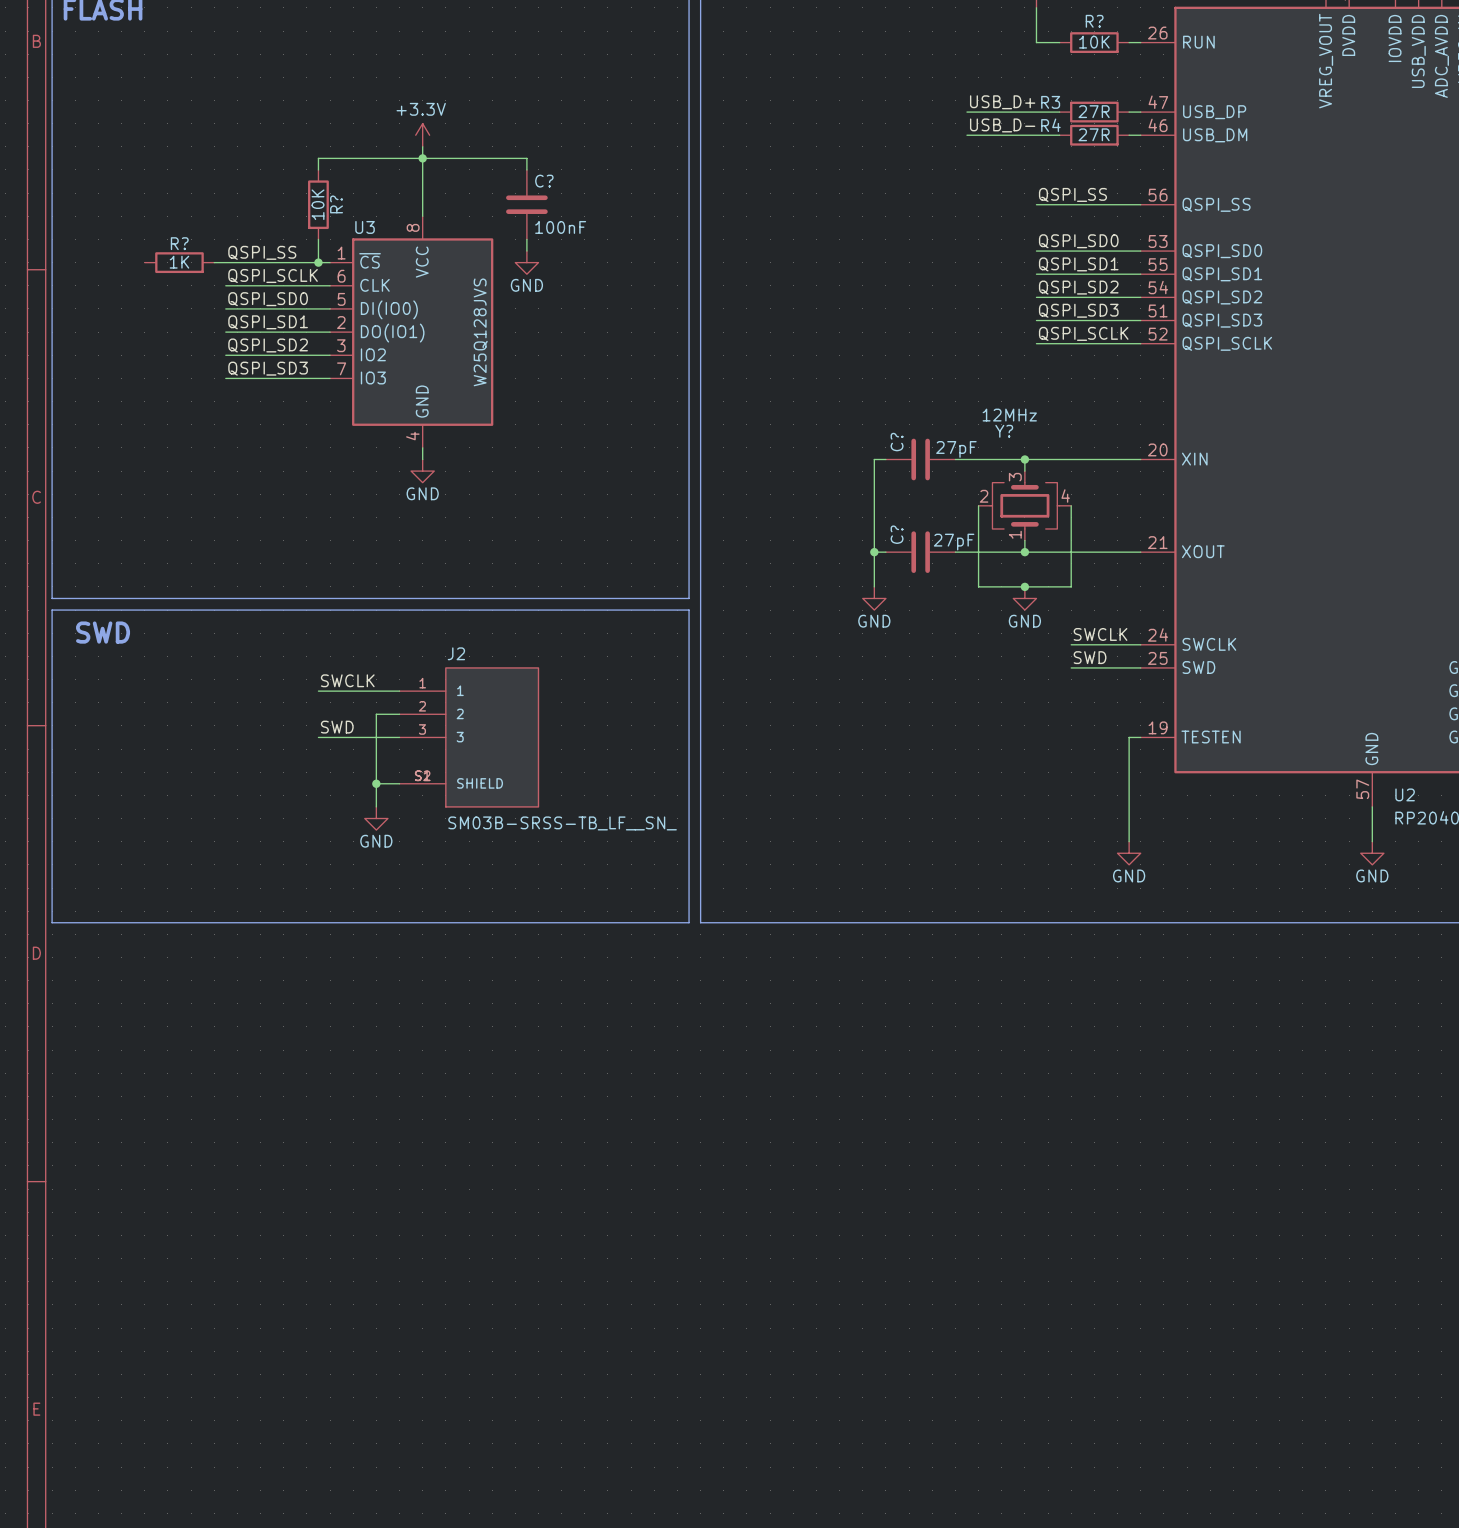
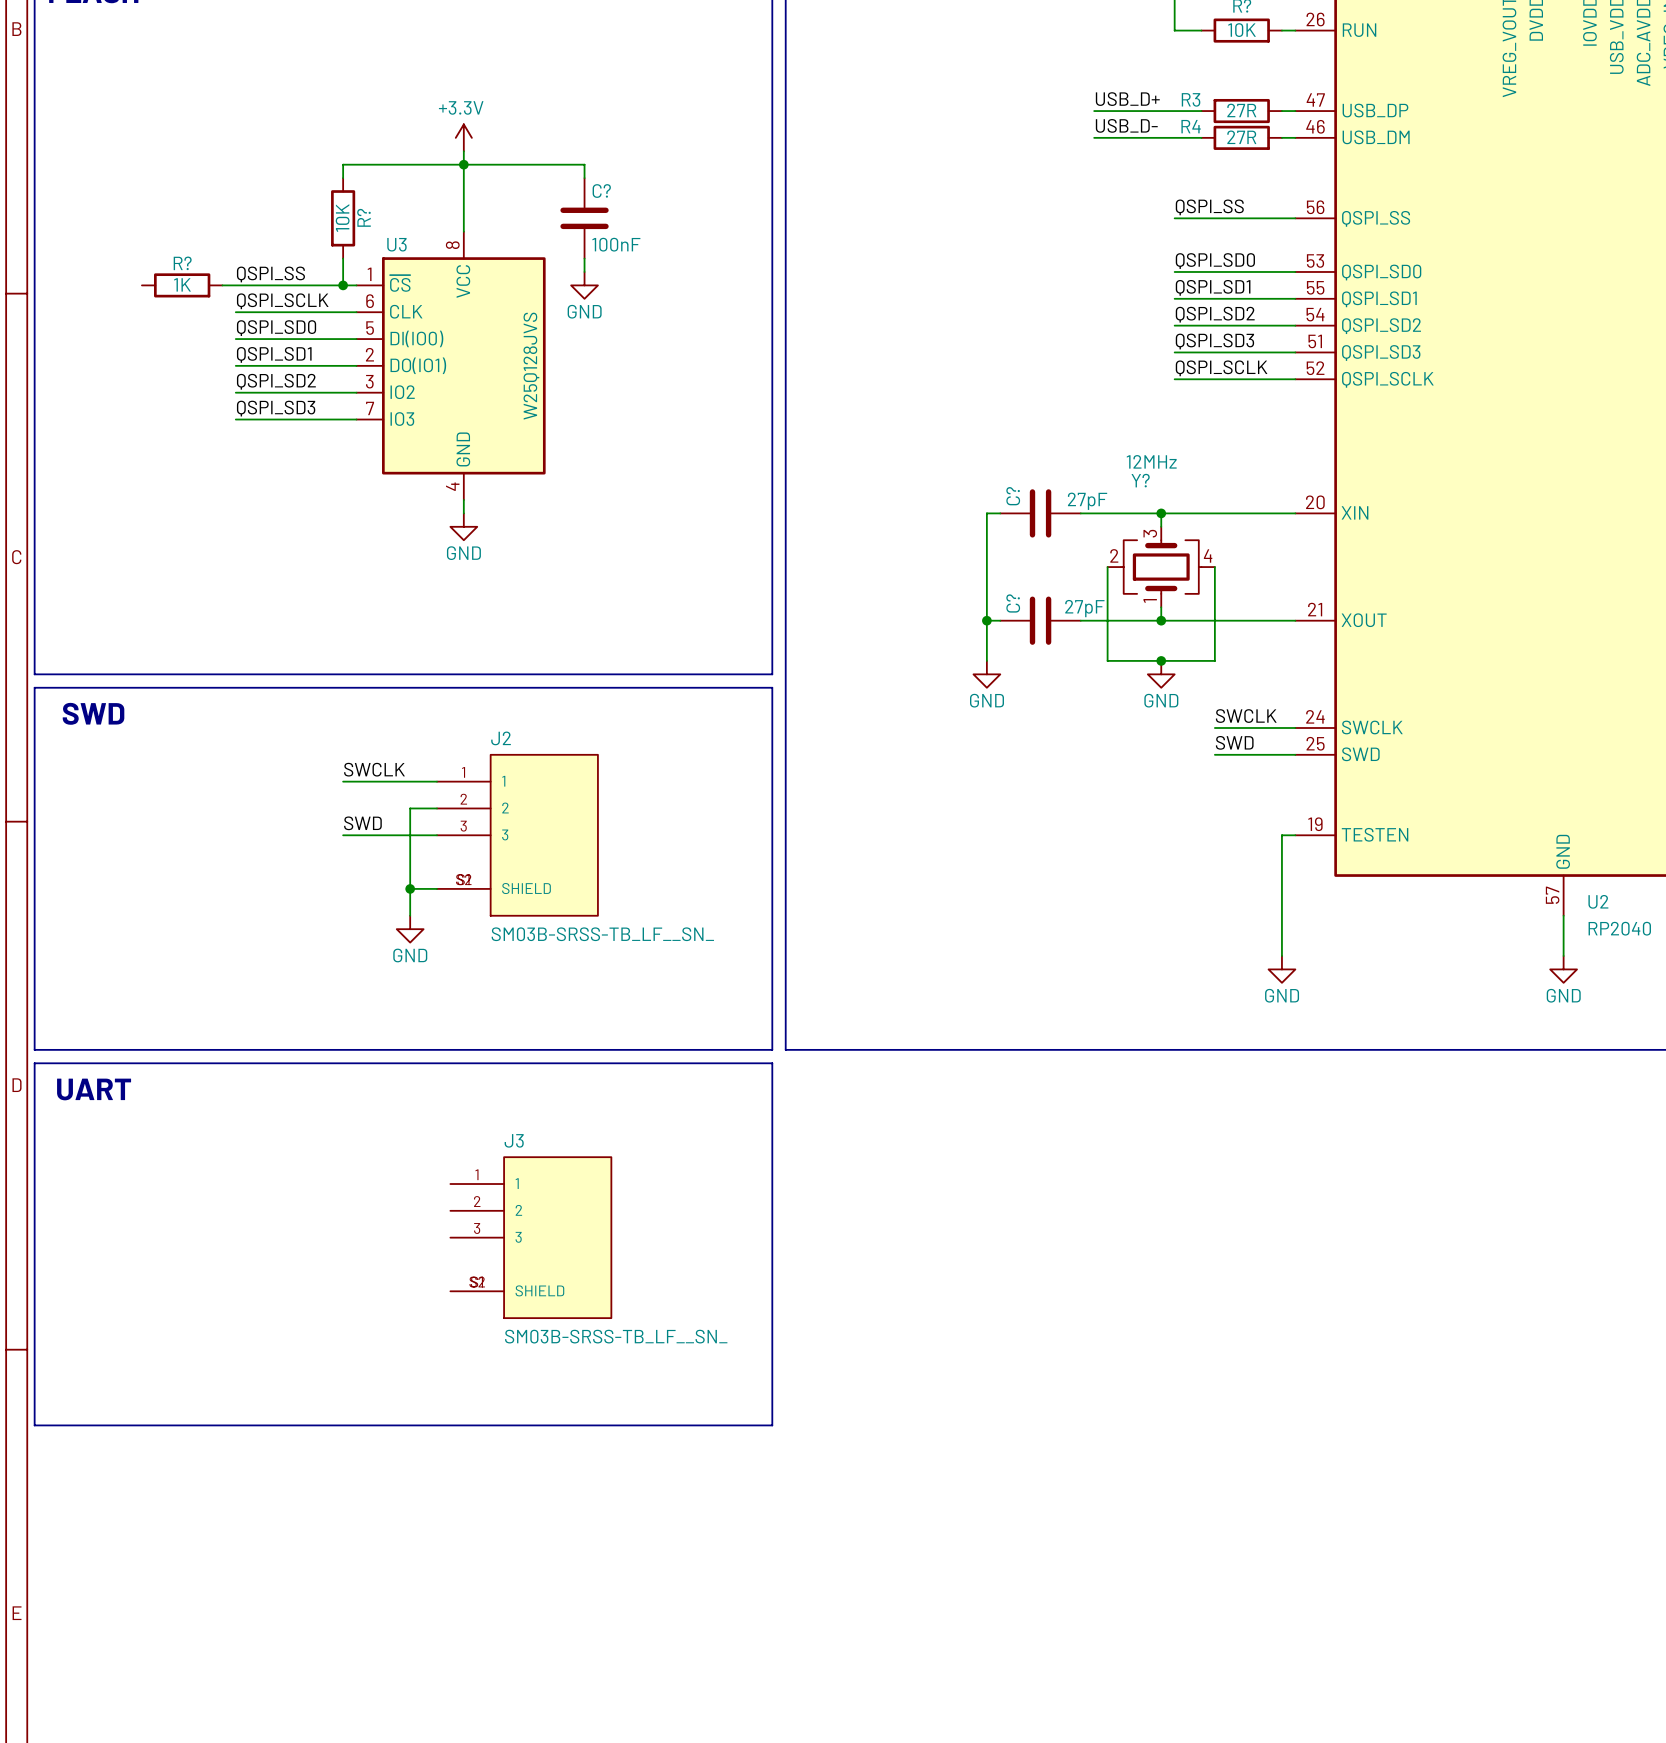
line: none -> (34, 1063) (772, 1063) (772, 1425) (34, 1425) (34, 1063)
text: none -> UART (94, 1089)
J3: none -> SM03B-SRSS-TB_LF__SN_ (531, 1237)

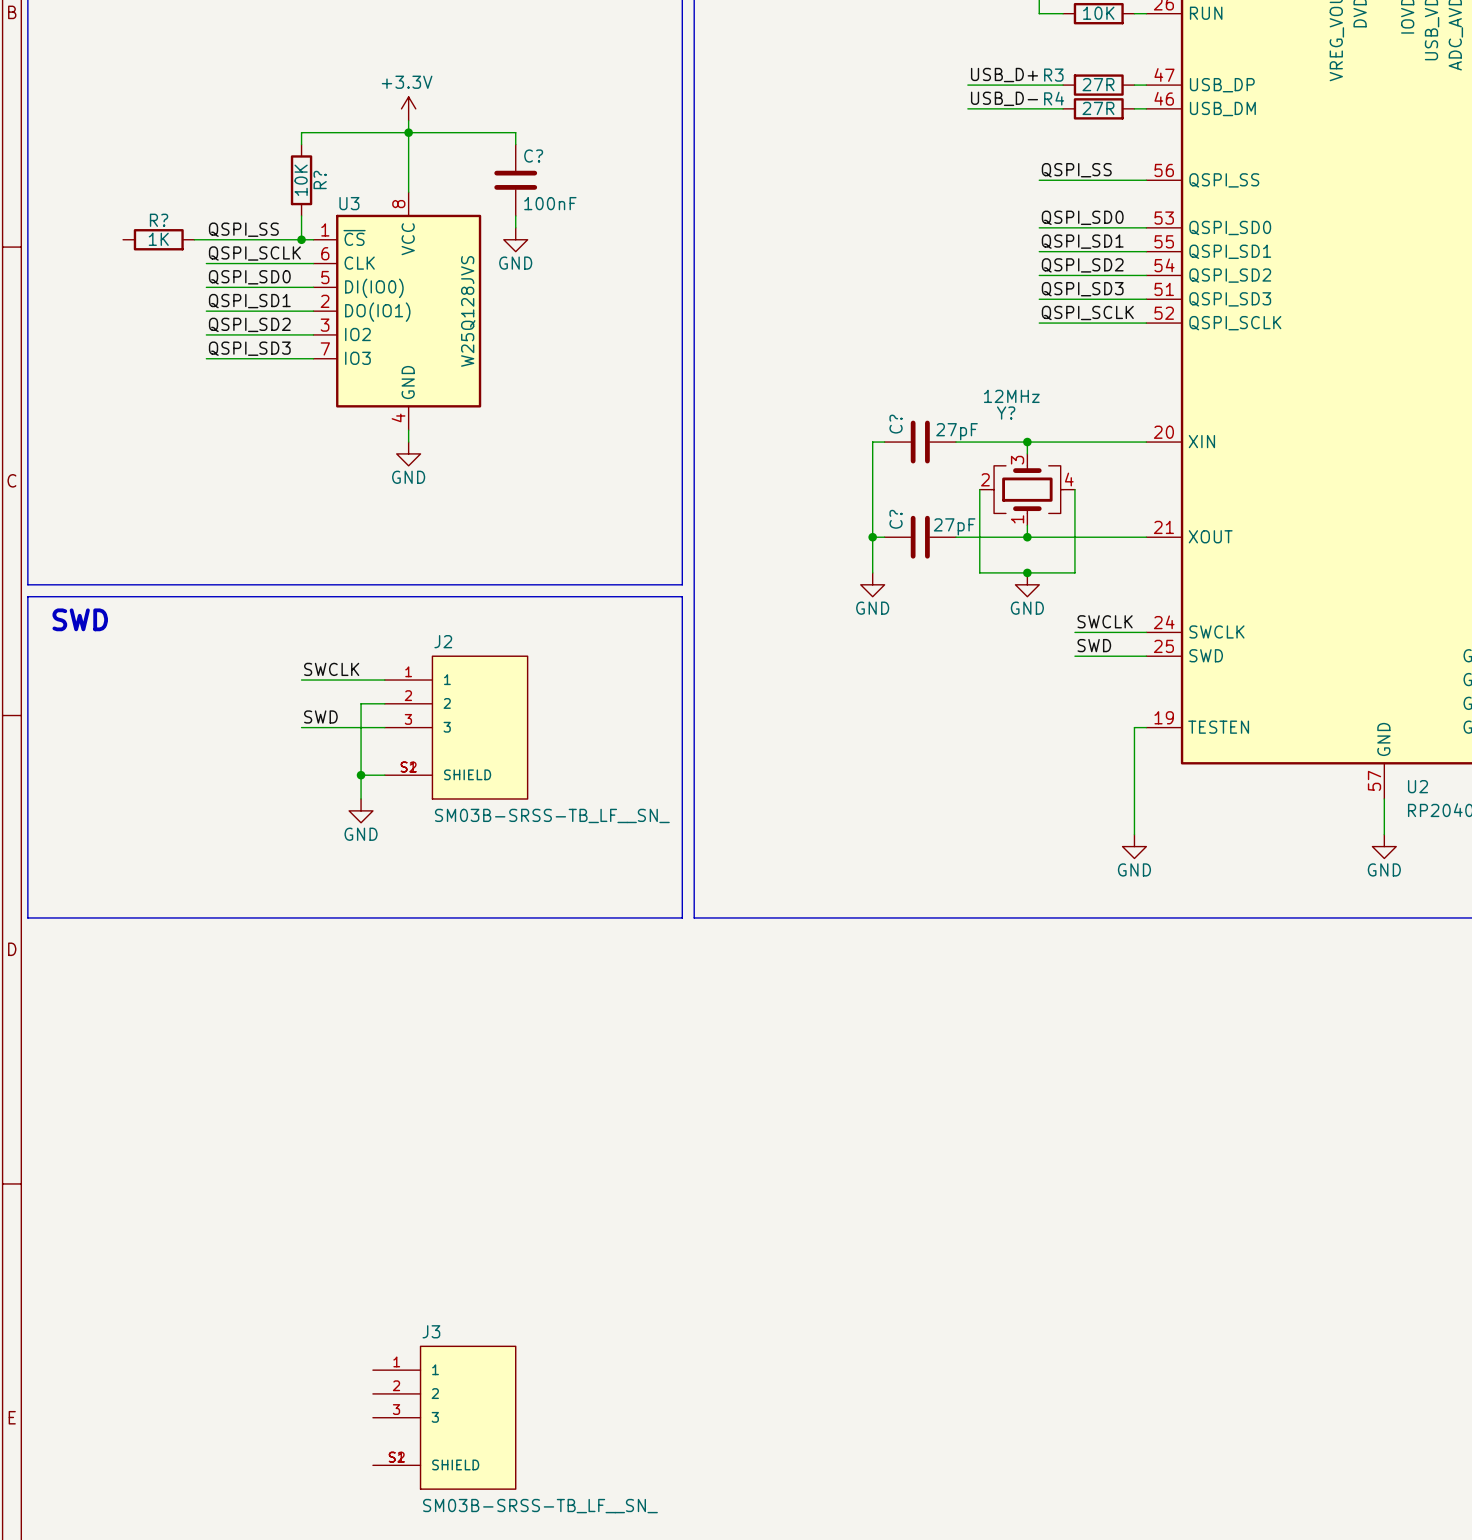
line: (34, 1063) (772, 1063) (772, 1425) (34, 1425) (34, 1063) -> none
text: UART (94, 1089) -> none
J3 position: (531, 1237) -> (444, 1417)

